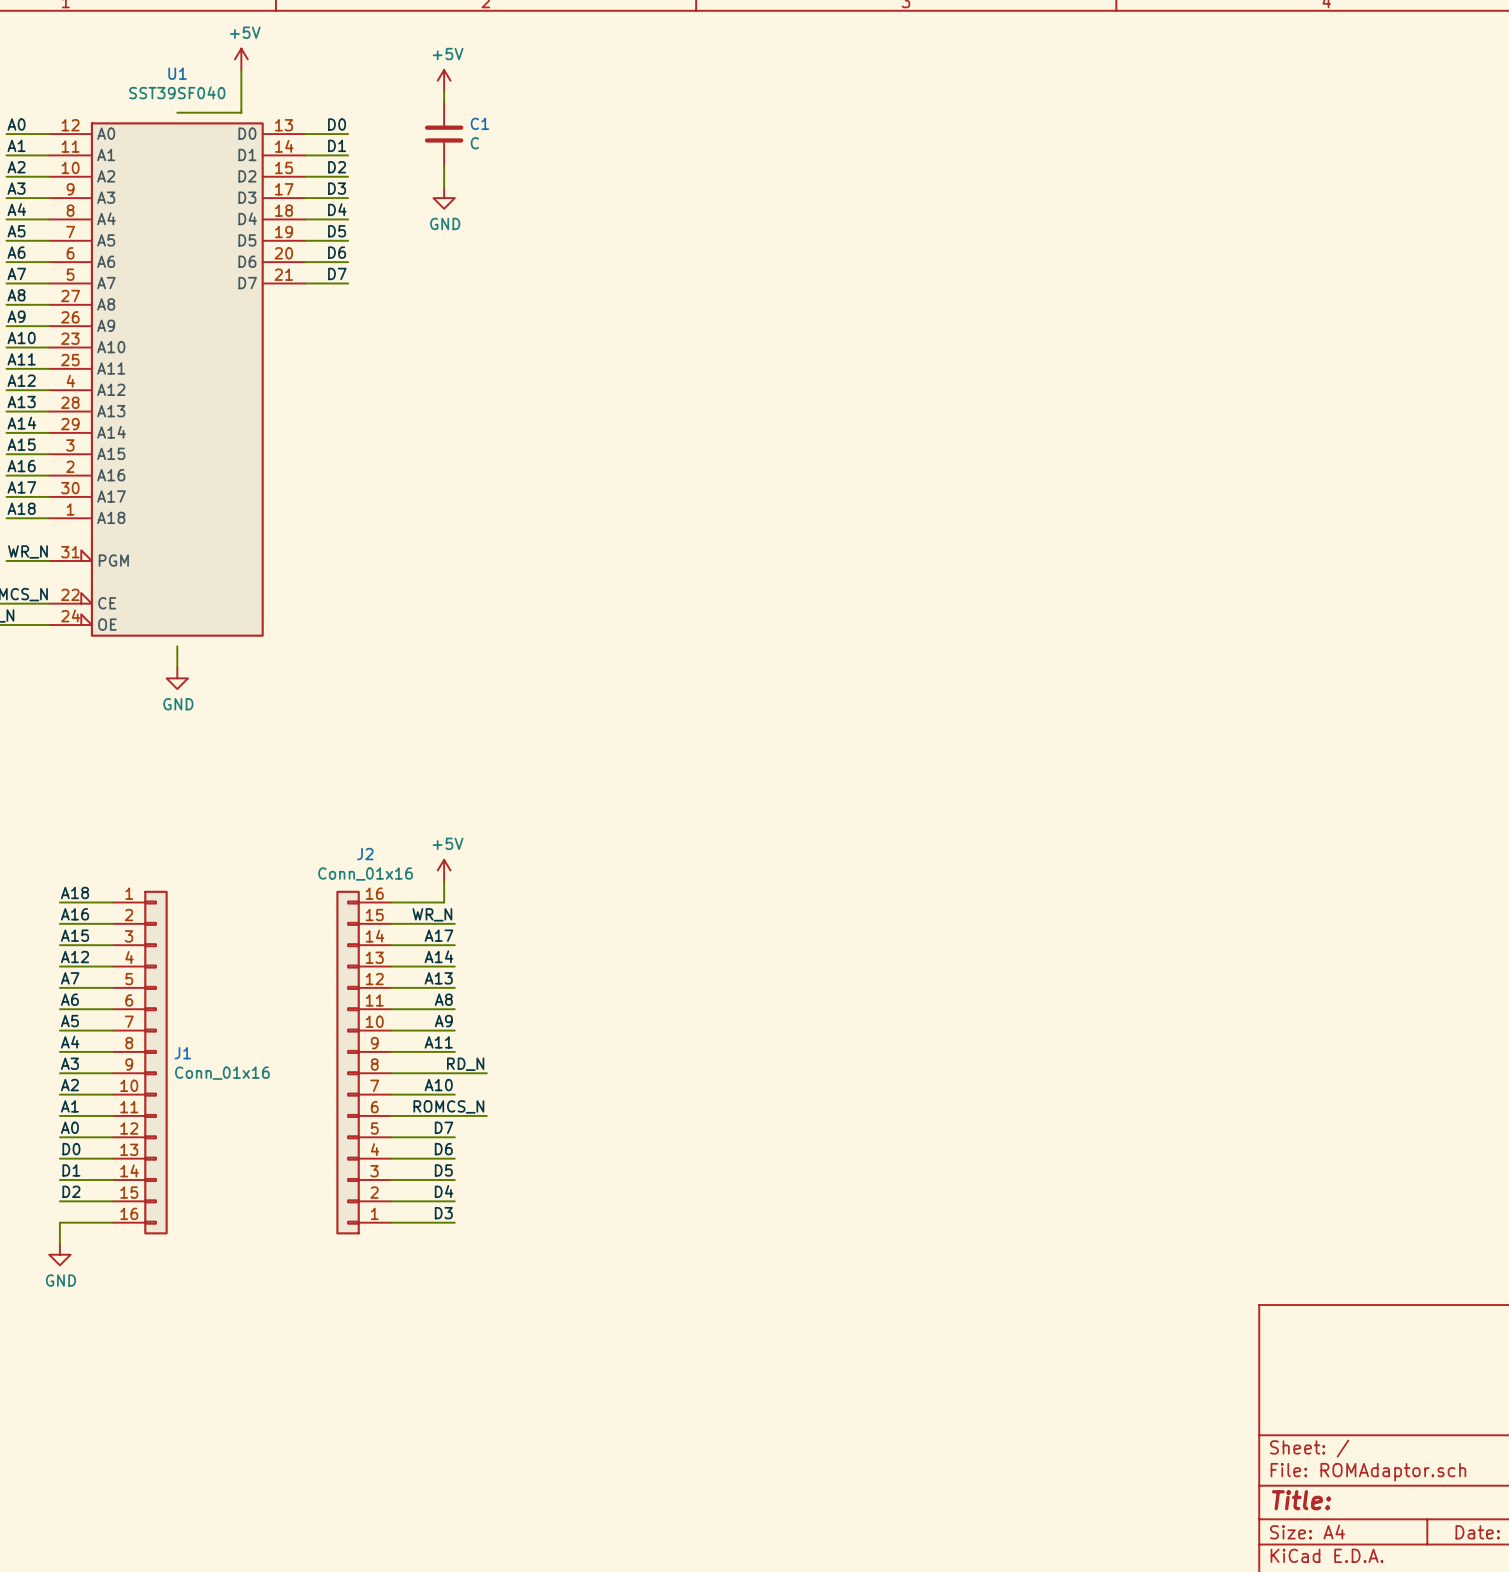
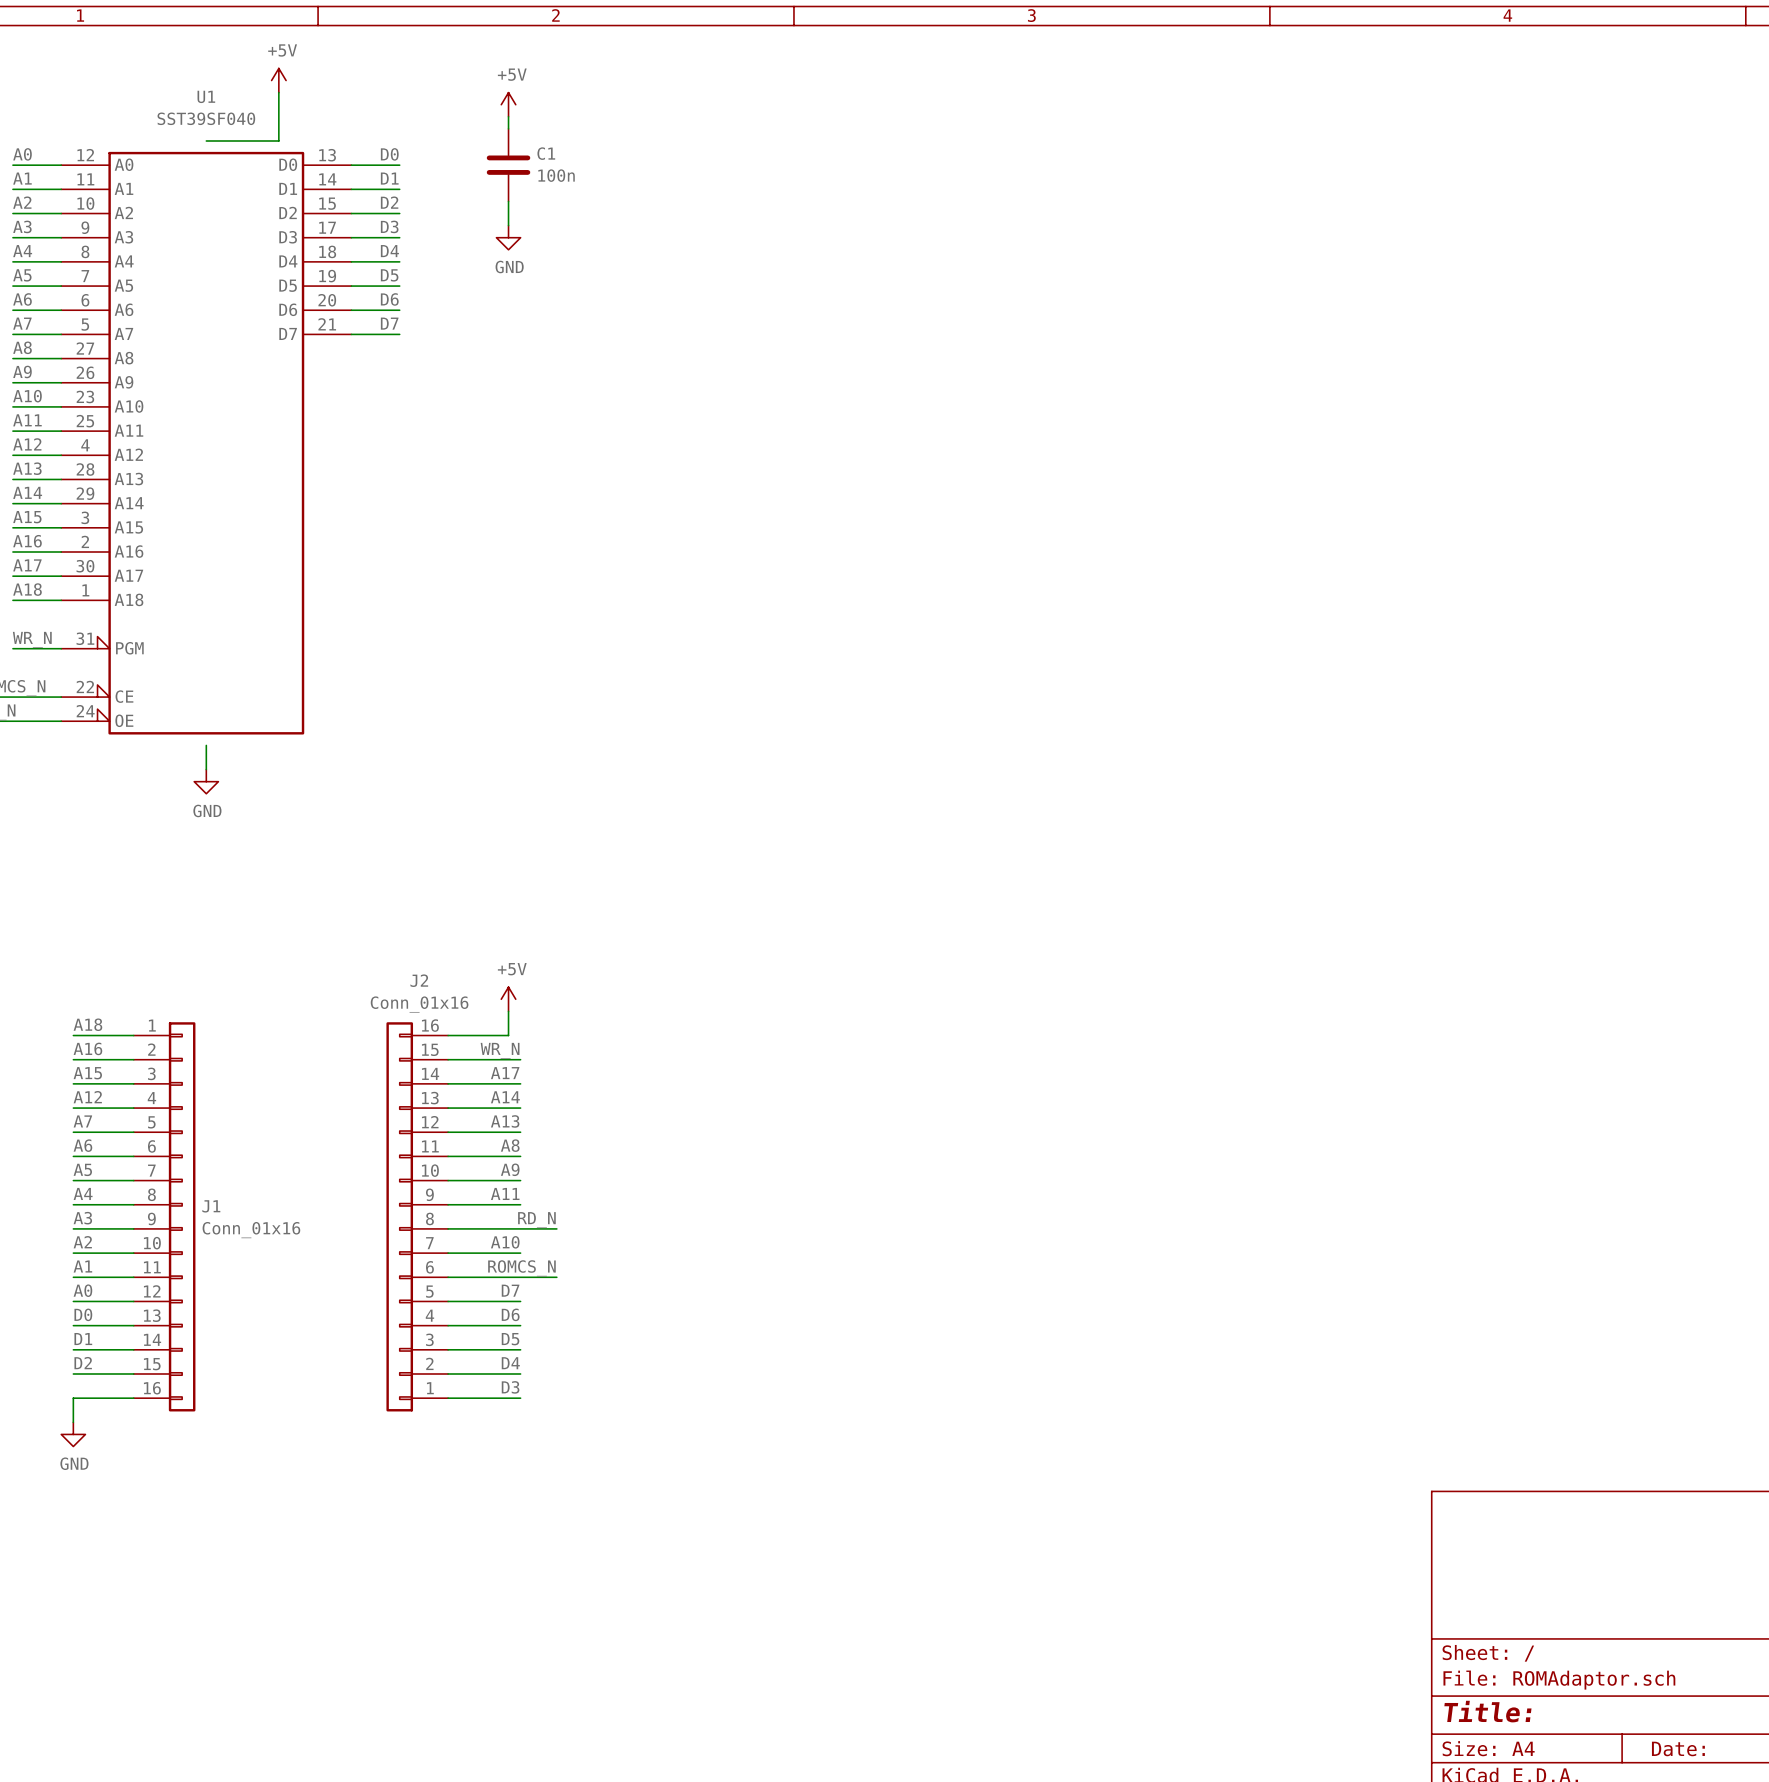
C1 value: C (474, 143) -> 100n (556, 175)

